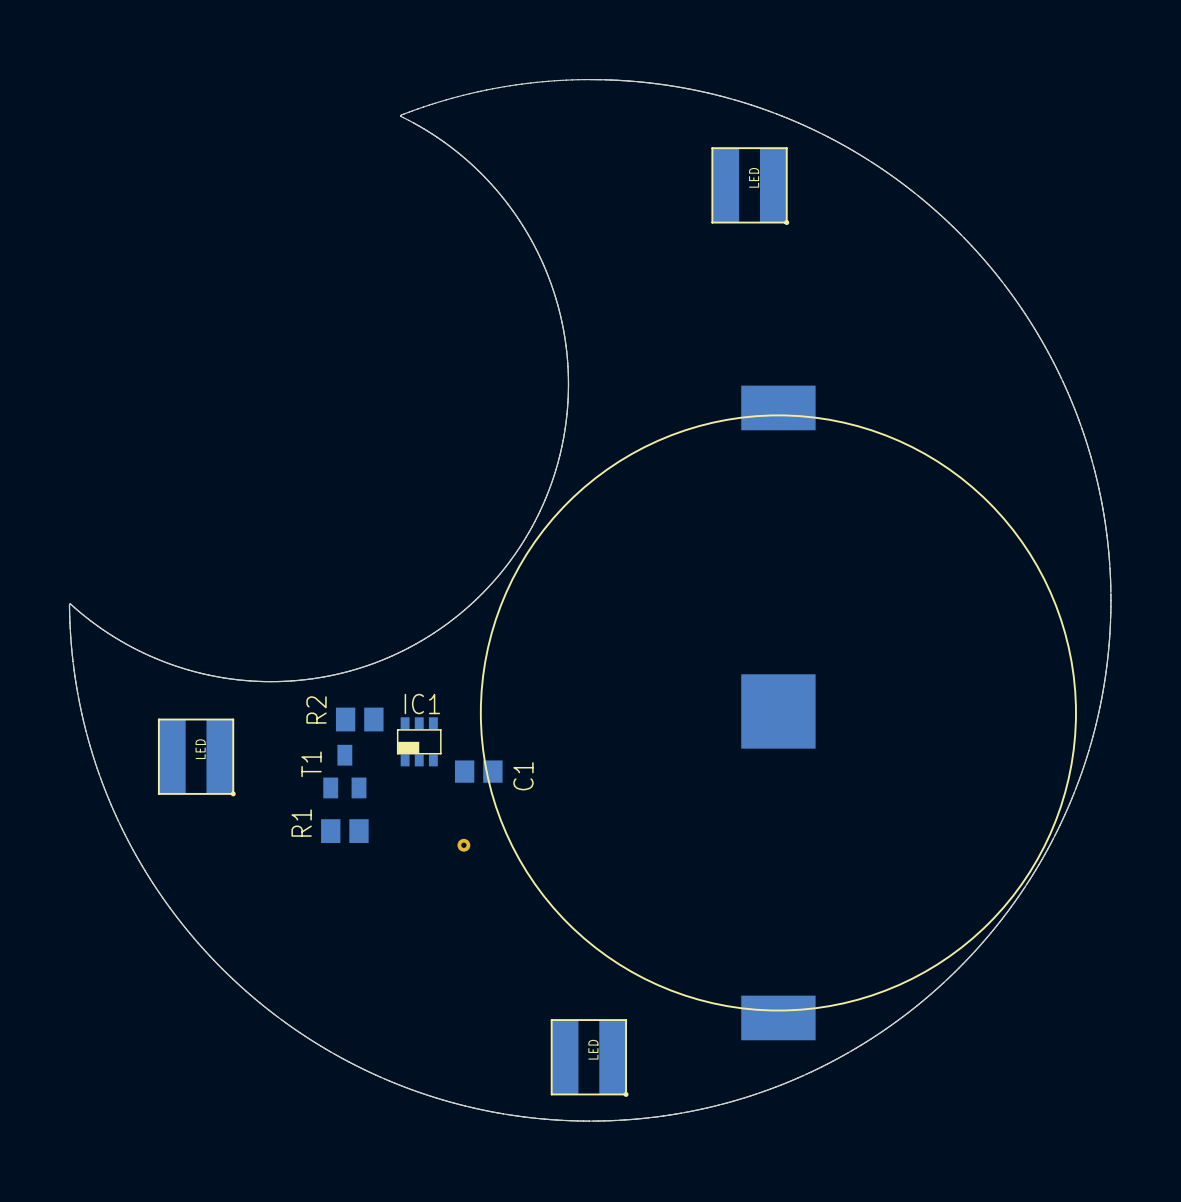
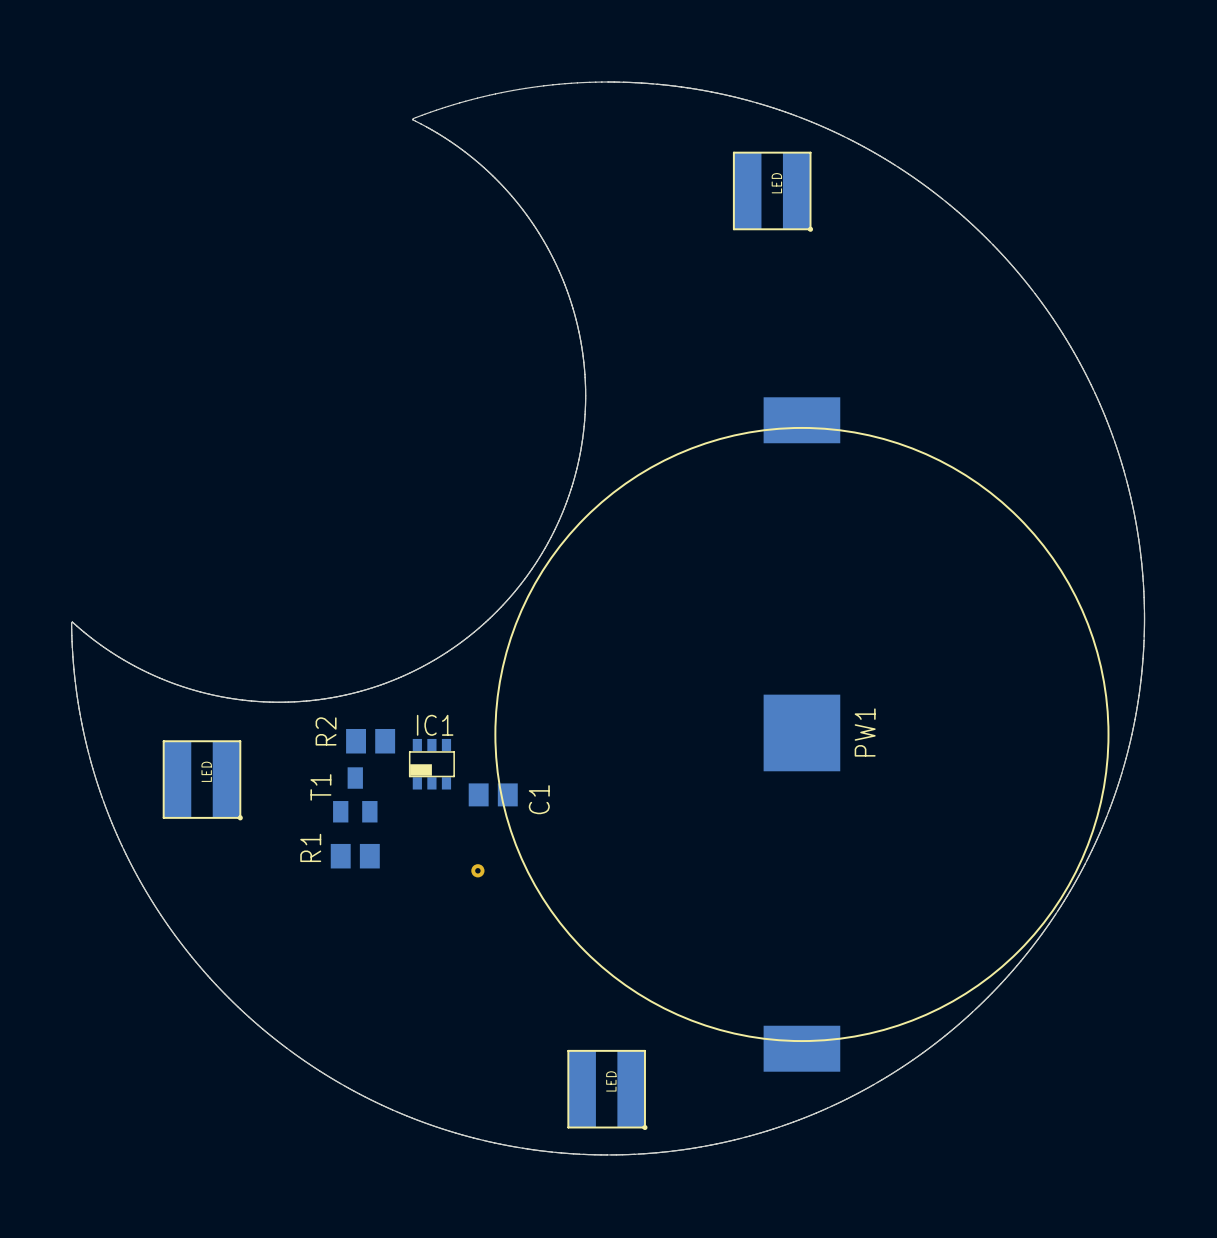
PW1 name: none -> PW1 (865, 732)

